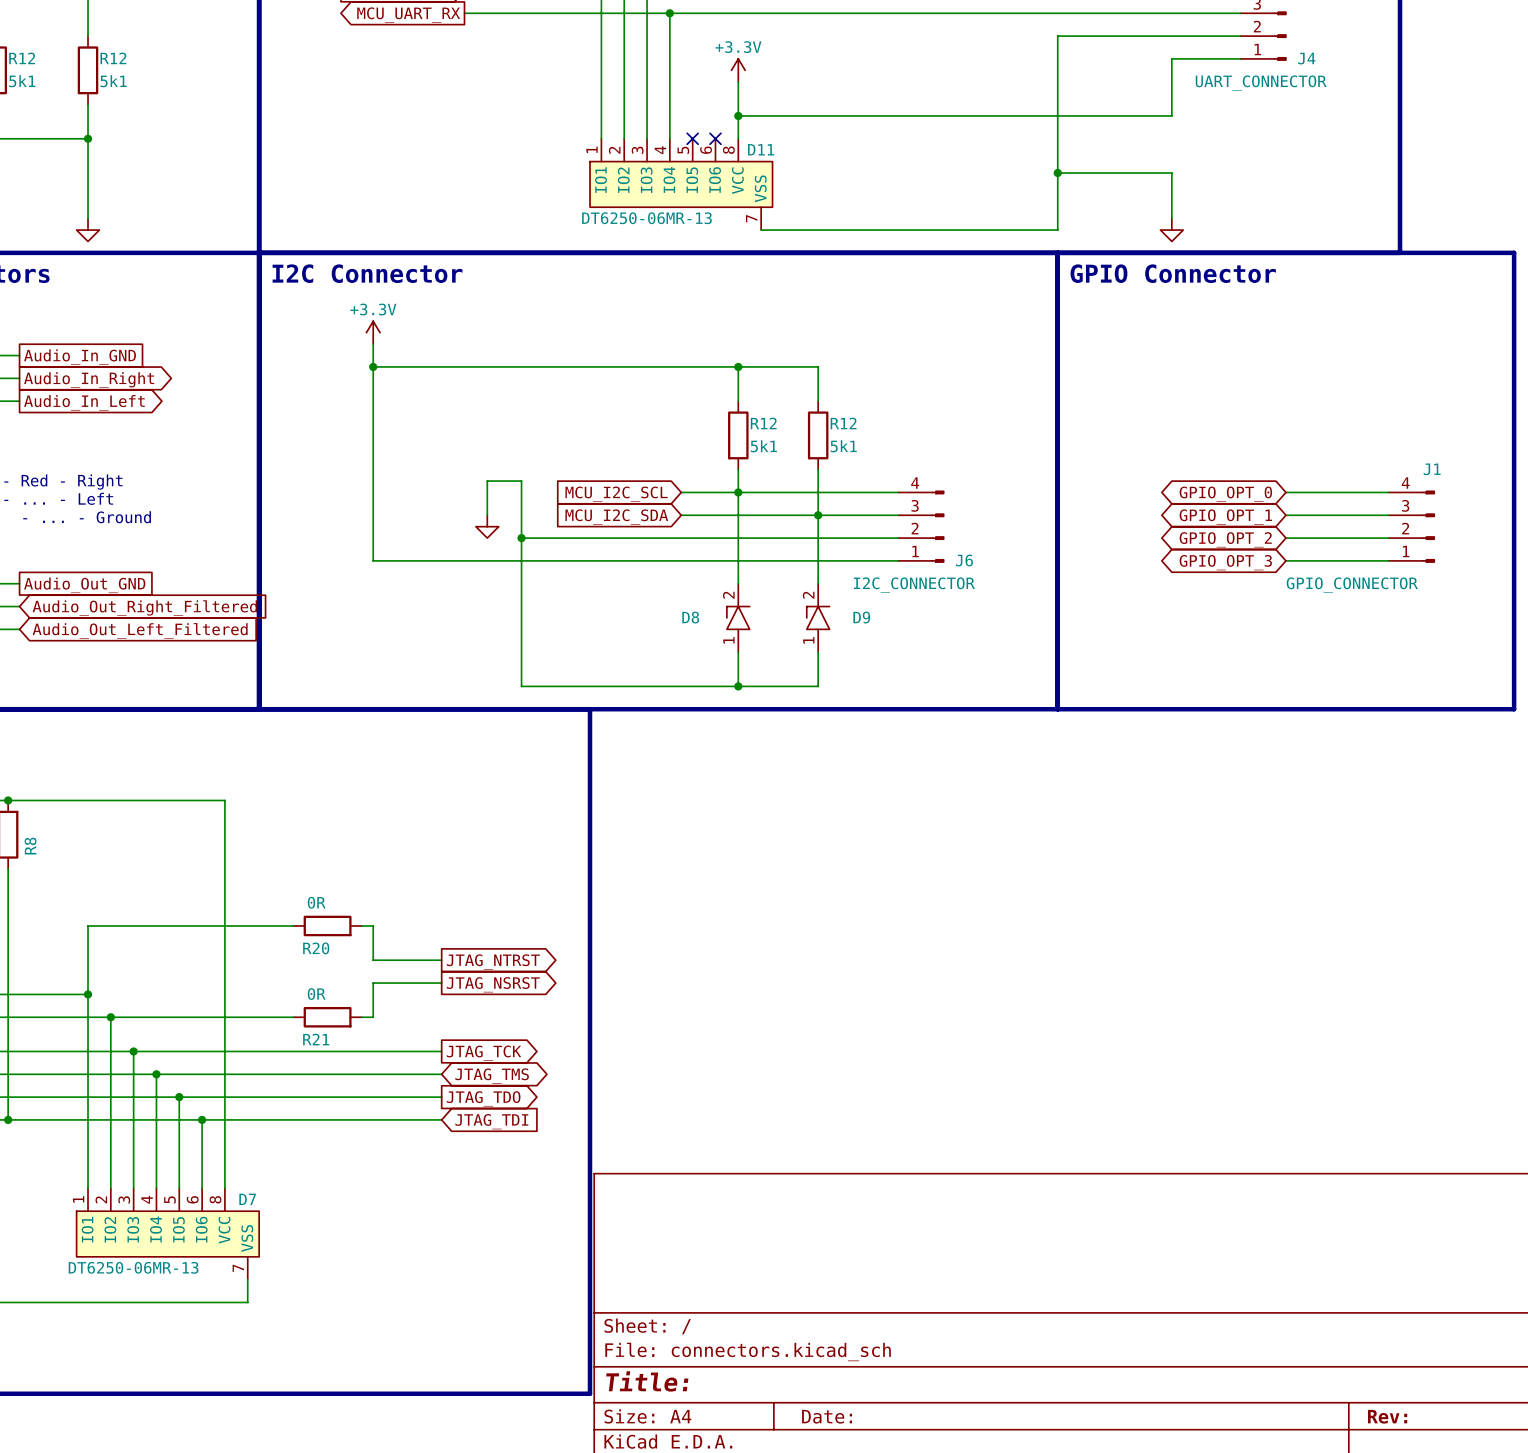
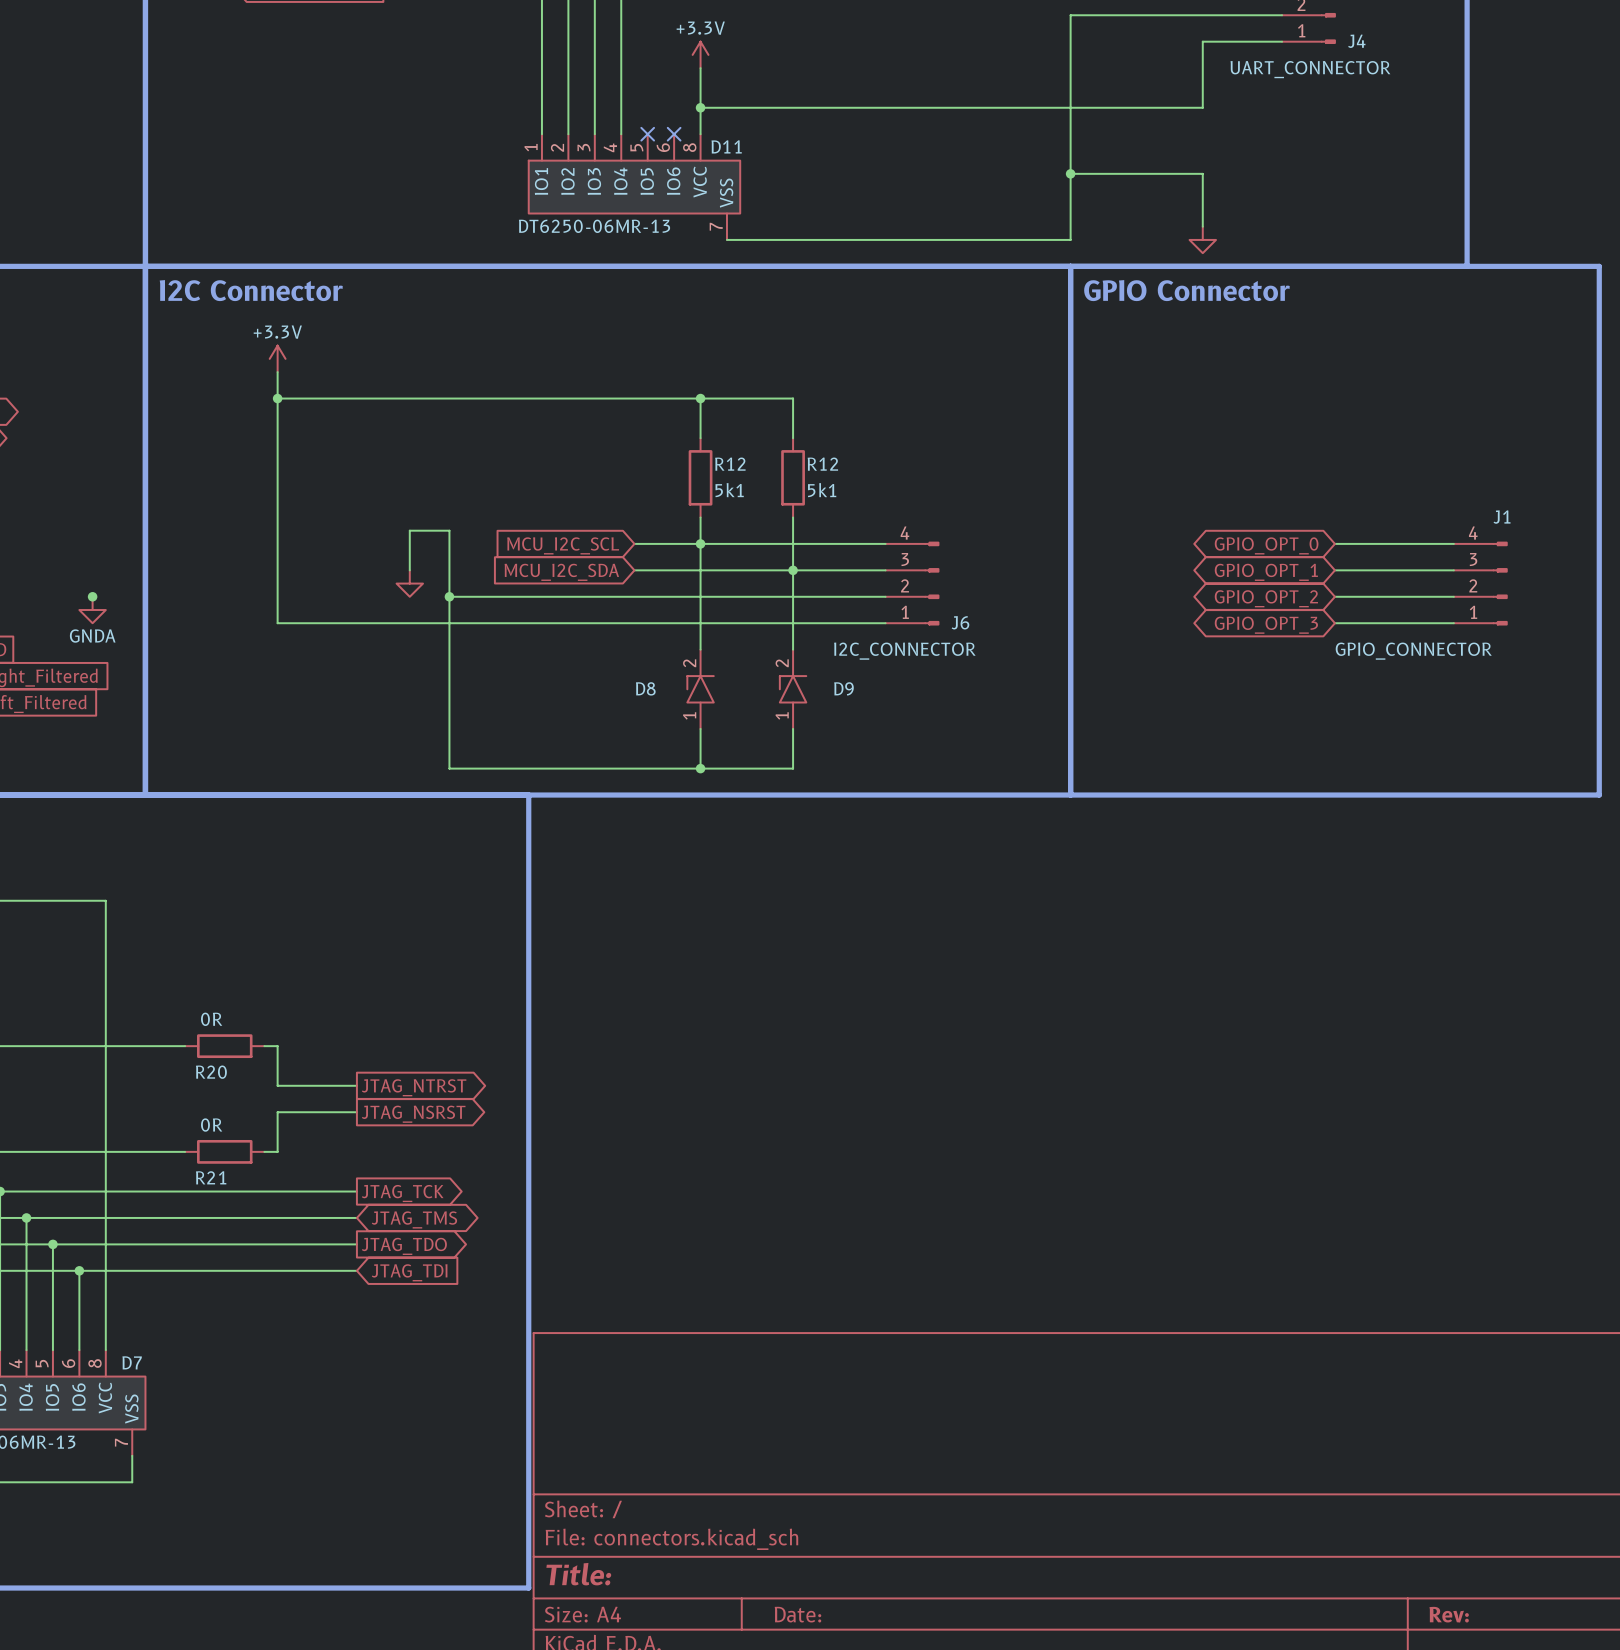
junction: none -> (92, 596)
power symbol: none -> GNDA (92, 610)

